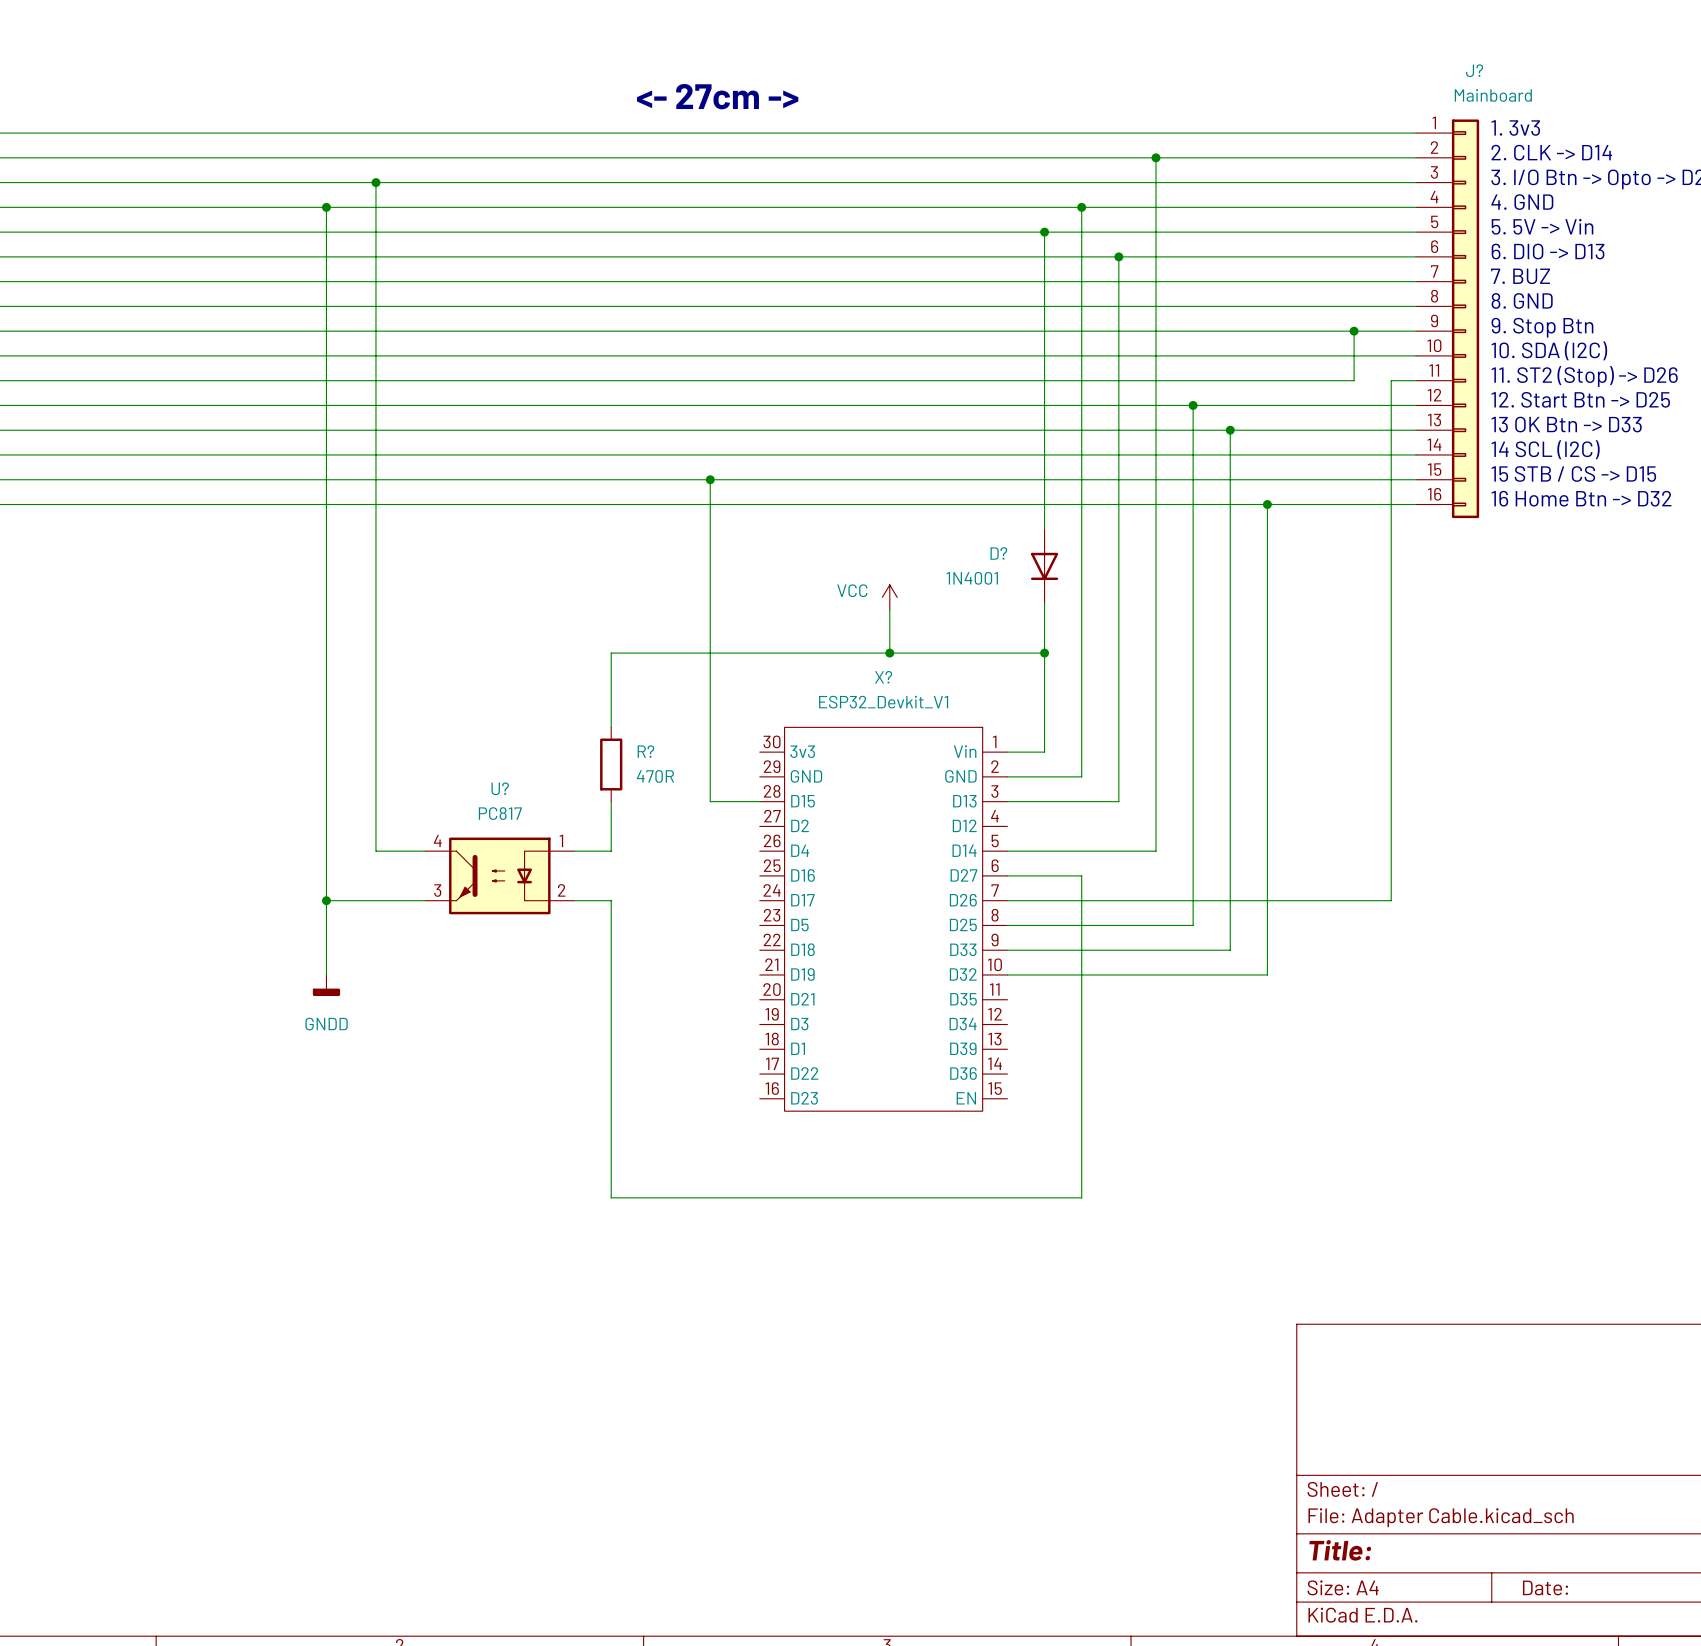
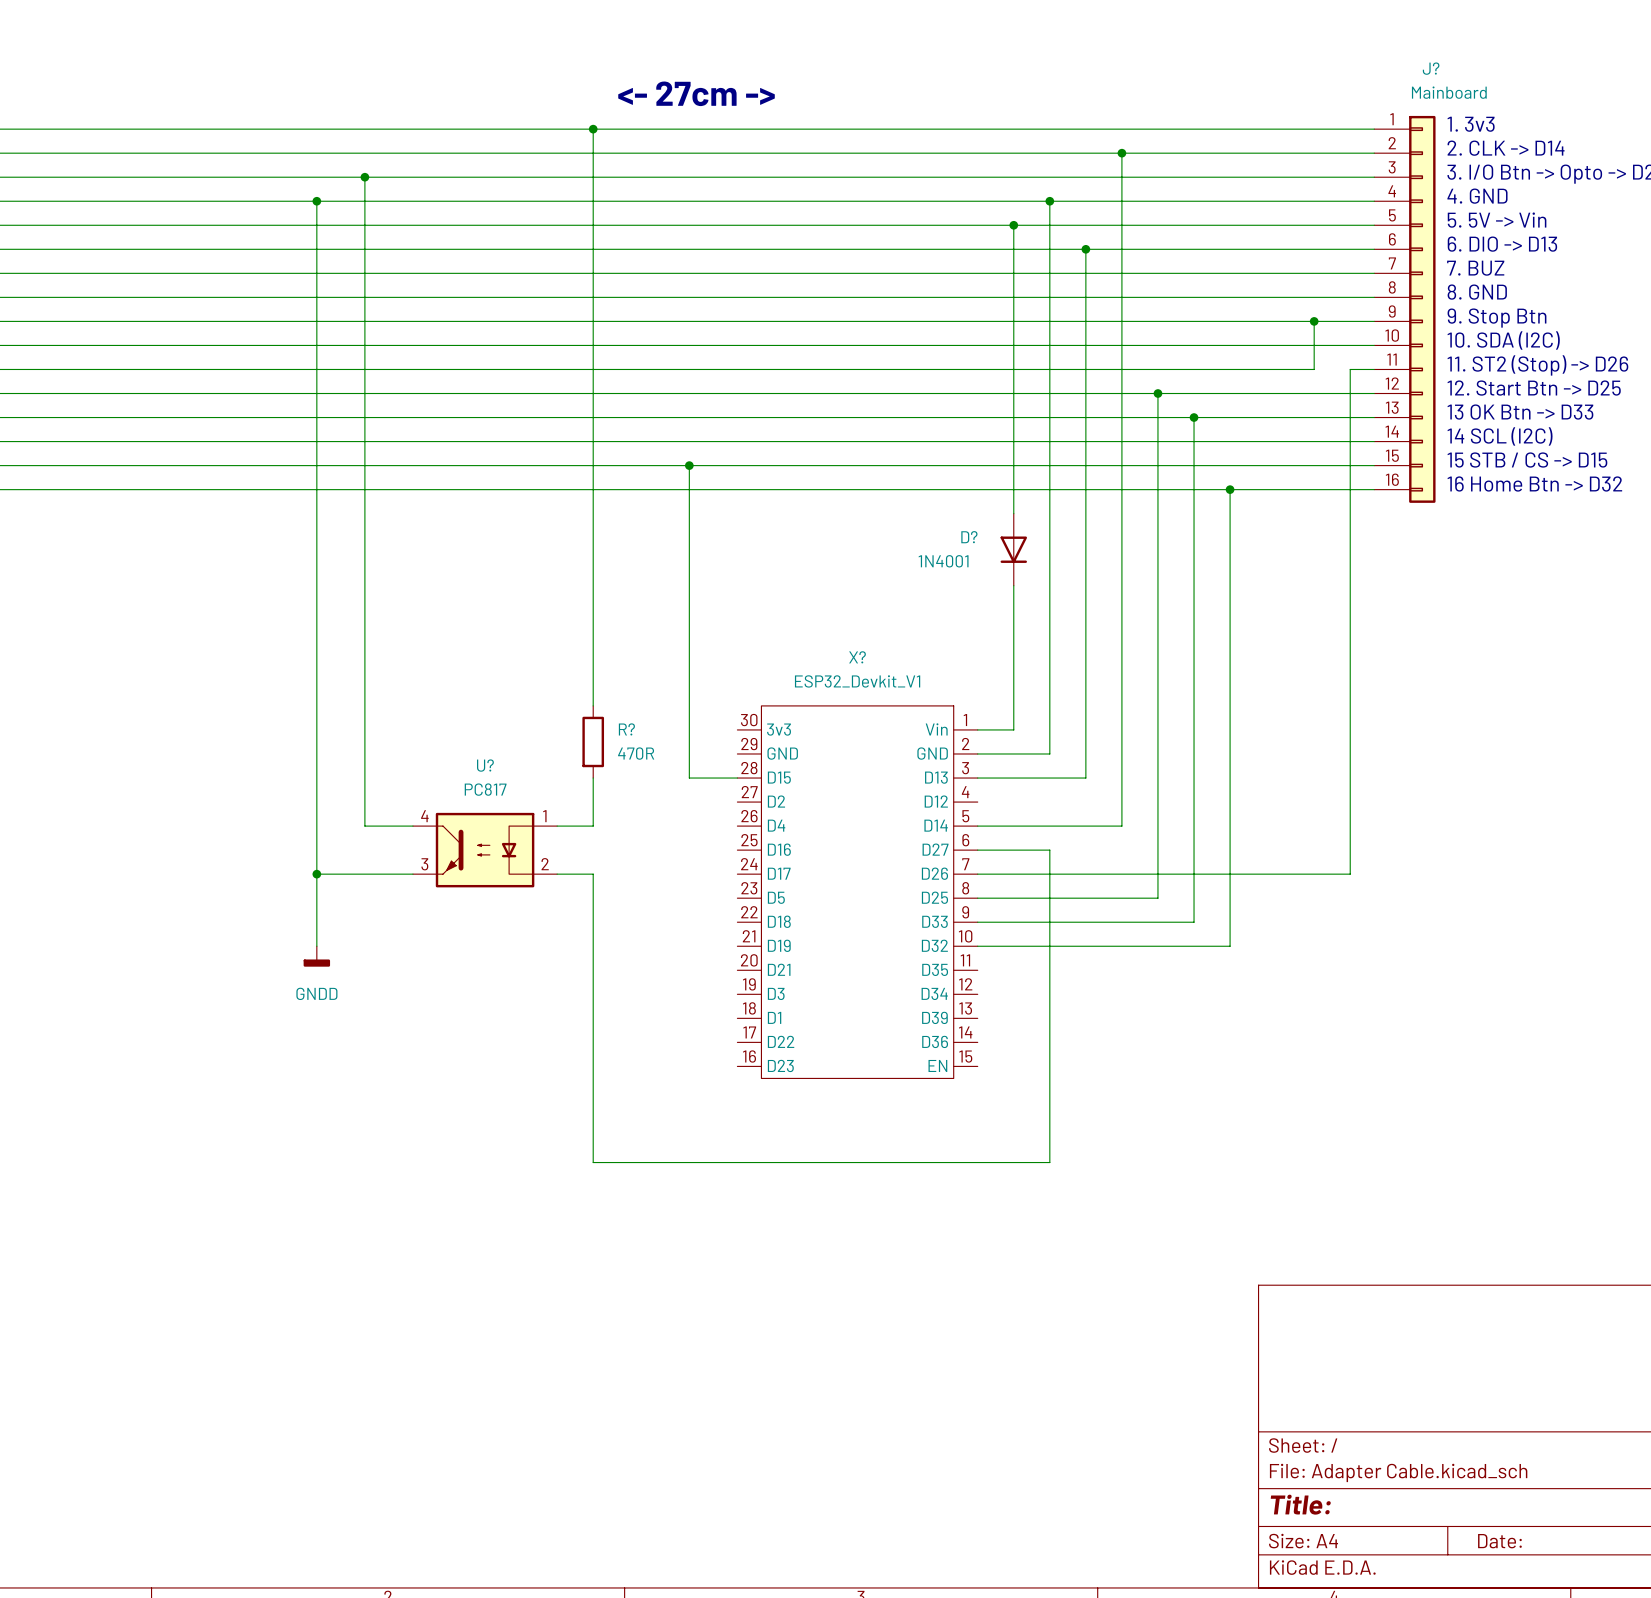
junction: none -> (593, 129)
power symbol: VCC (889, 597) -> none
wire: (889, 609) (889, 653) -> none
wire: (611, 653) (1044, 653) -> (593, 633) (593, 129)
junction: (889, 653) -> none
junction: (1044, 653) -> none

